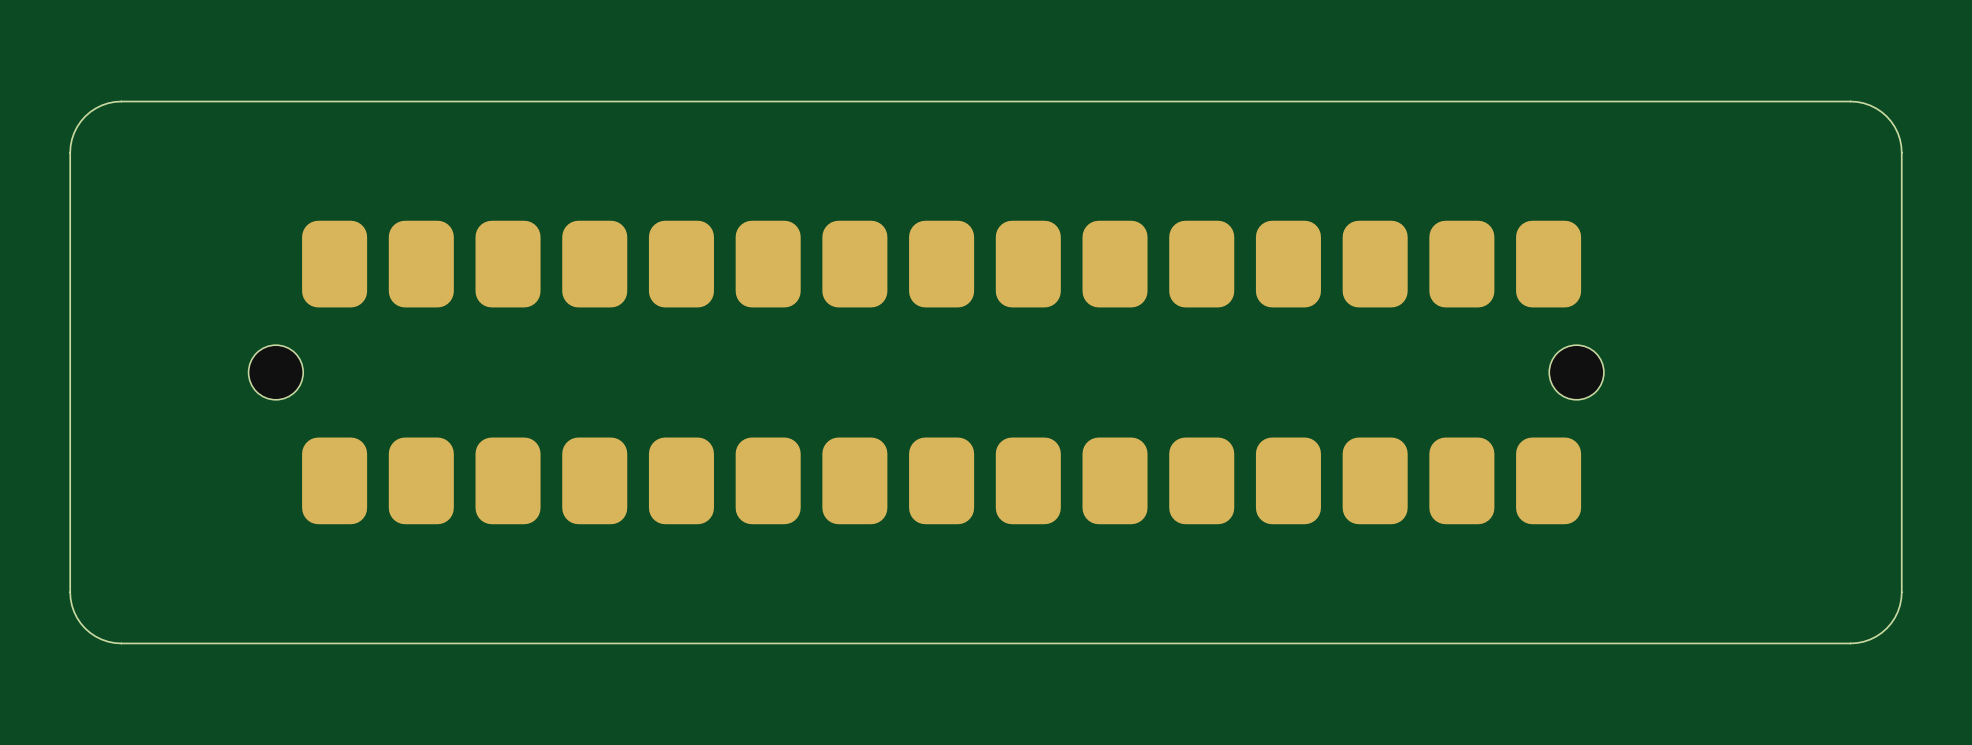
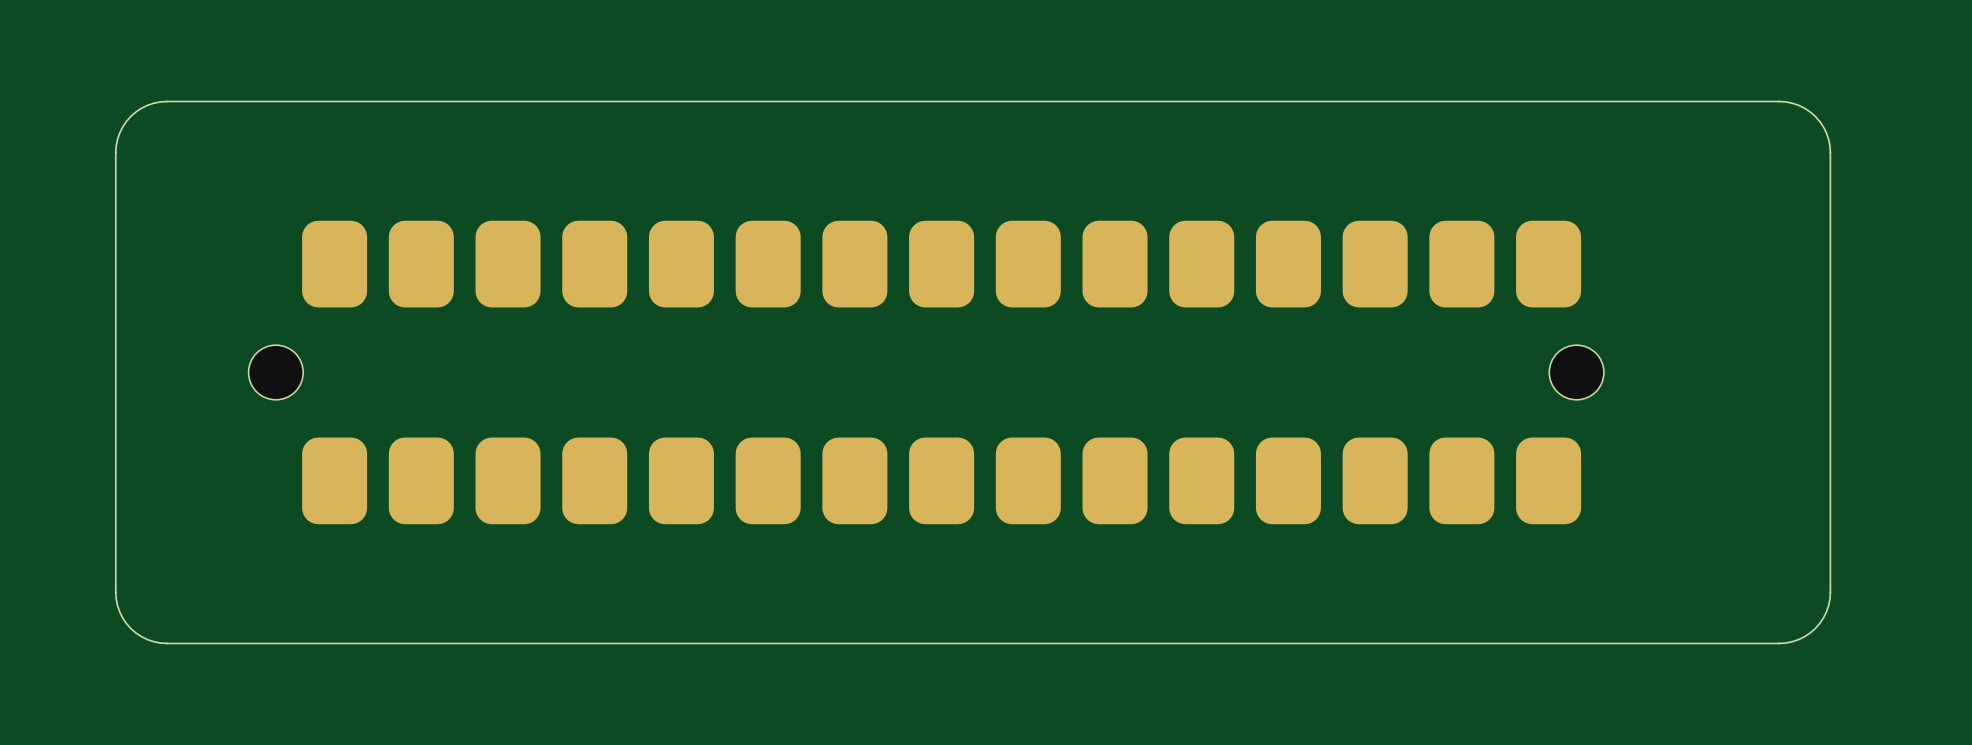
board edge: (166, 101) (114, 101) (95, 108) (85, 116) (77, 127) (71, 139) (70, 152) (70, 598) (74, 611) (80, 623) (90, 632) (101, 639) (121, 643) (166, 643) -> (166, 101) (147, 105) (130, 116) (119, 133) (115, 152) (116, 598) (122, 617) (135, 632) (153, 641) (166, 643)
board edge: (1779, 101) (1850, 101) (1870, 105) (1881, 112) (1891, 121) (1897, 133) (1901, 152) (1901, 592) (1900, 605) (1894, 617) (1886, 628) (1876, 636) (1863, 641) (1779, 643) -> (1779, 101) (1798, 105) (1815, 116) (1826, 133) (1830, 152) (1829, 598) (1823, 617) (1810, 632) (1798, 639) (1779, 643)

